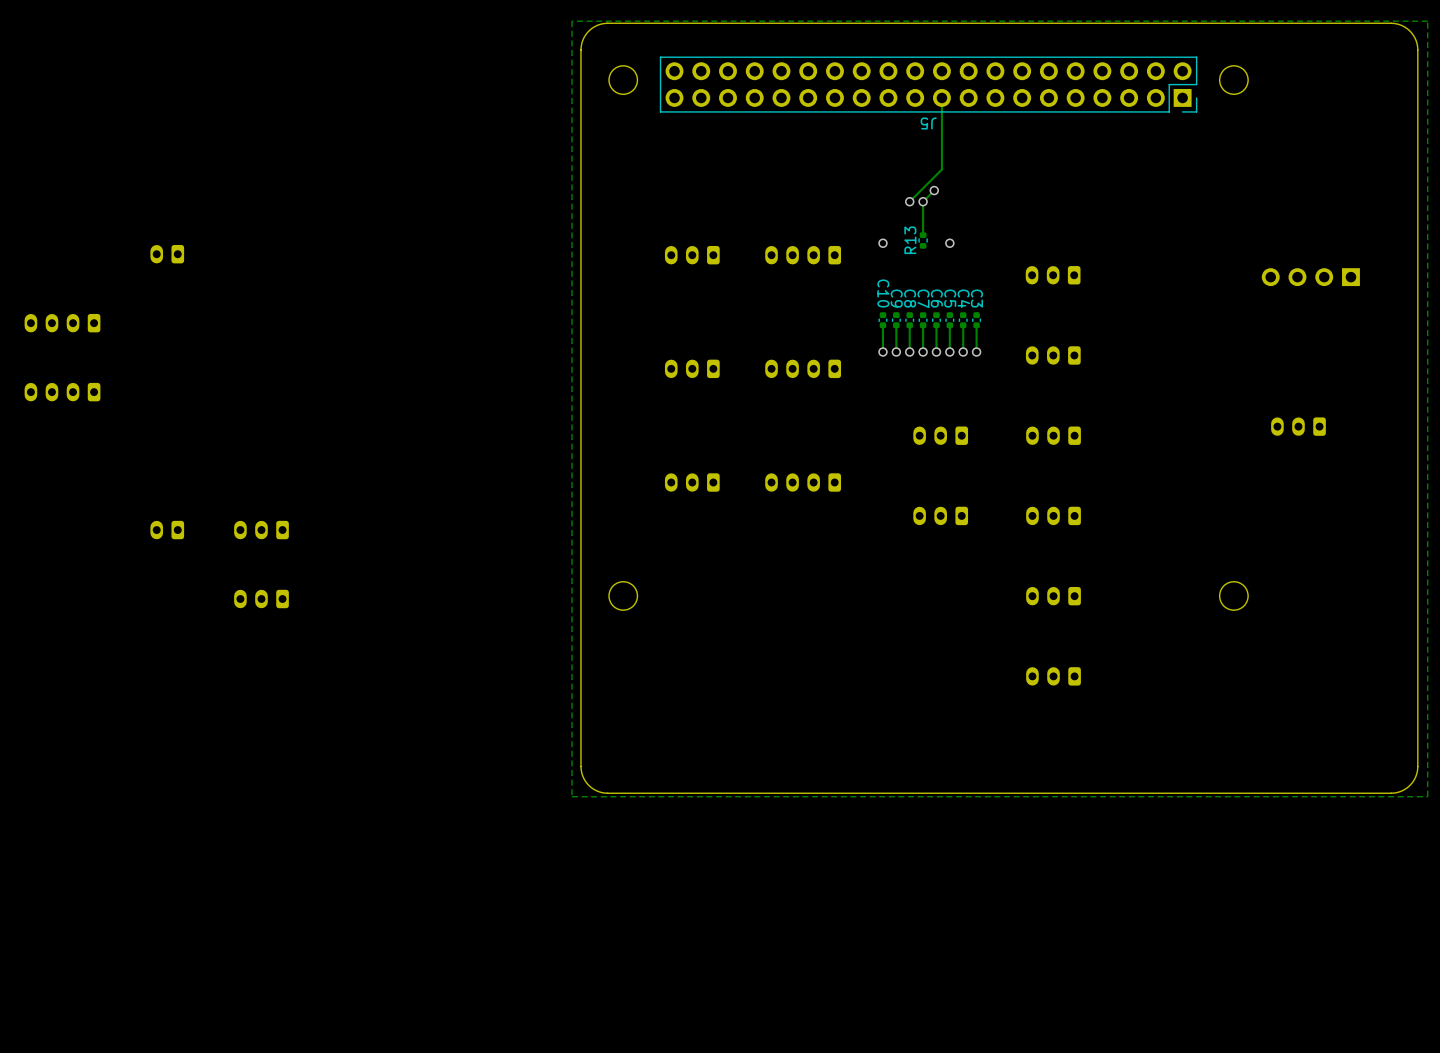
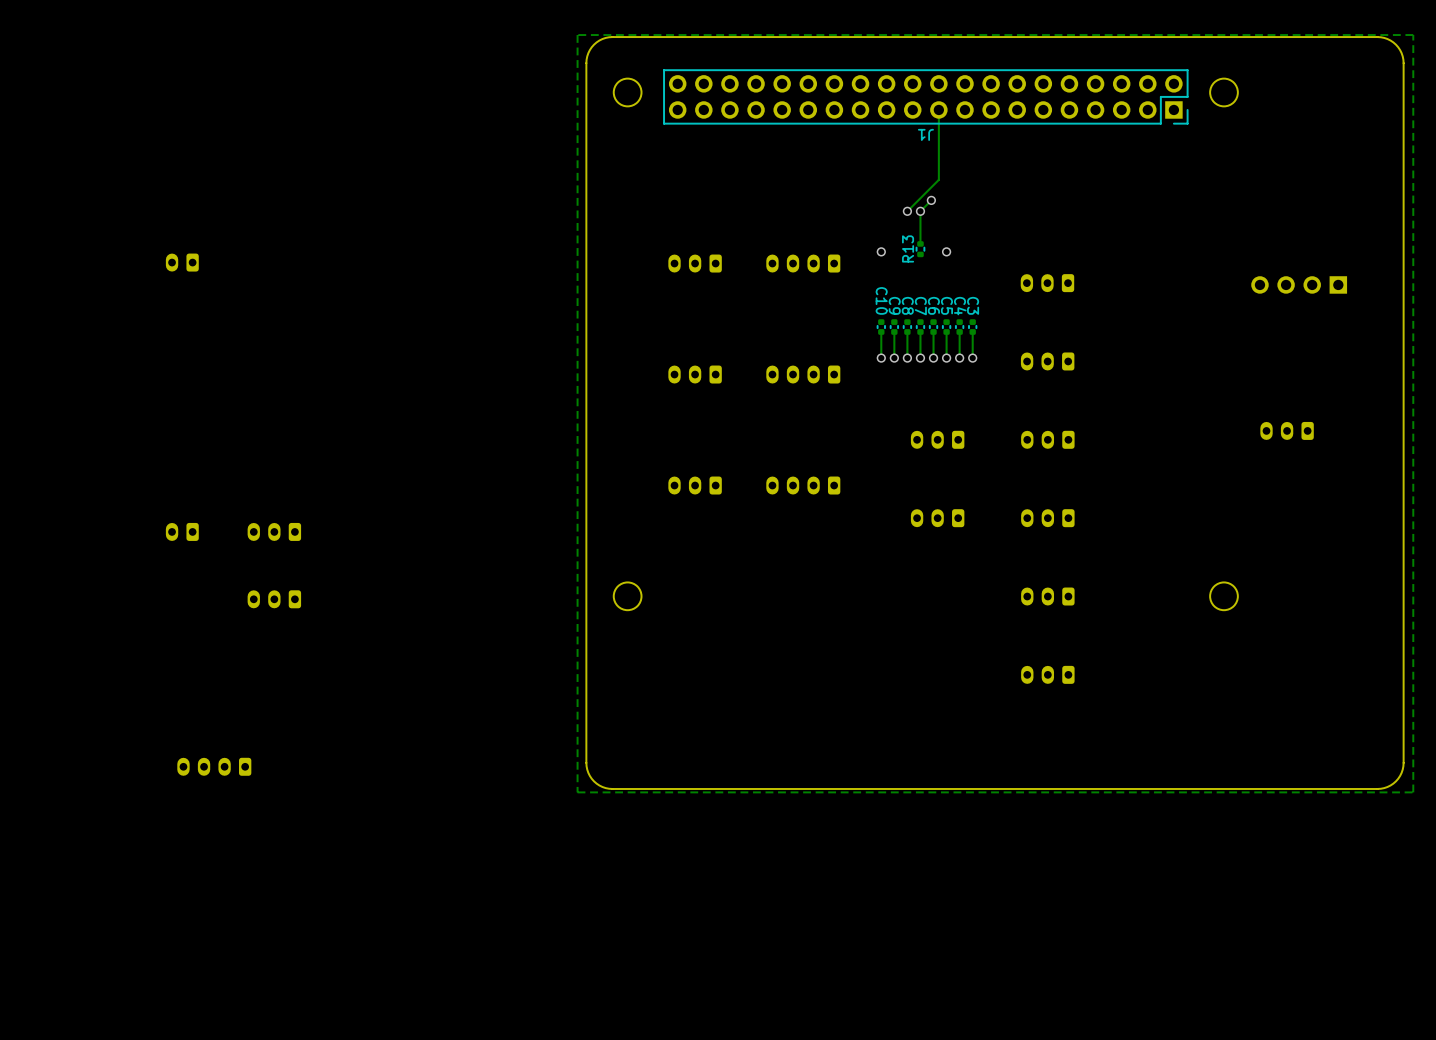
J5 name: J5 (928, 123) -> J1 (925, 134)
part: (62, 323) -> none
part: (62, 392) -> none
part: none -> (214, 766)

